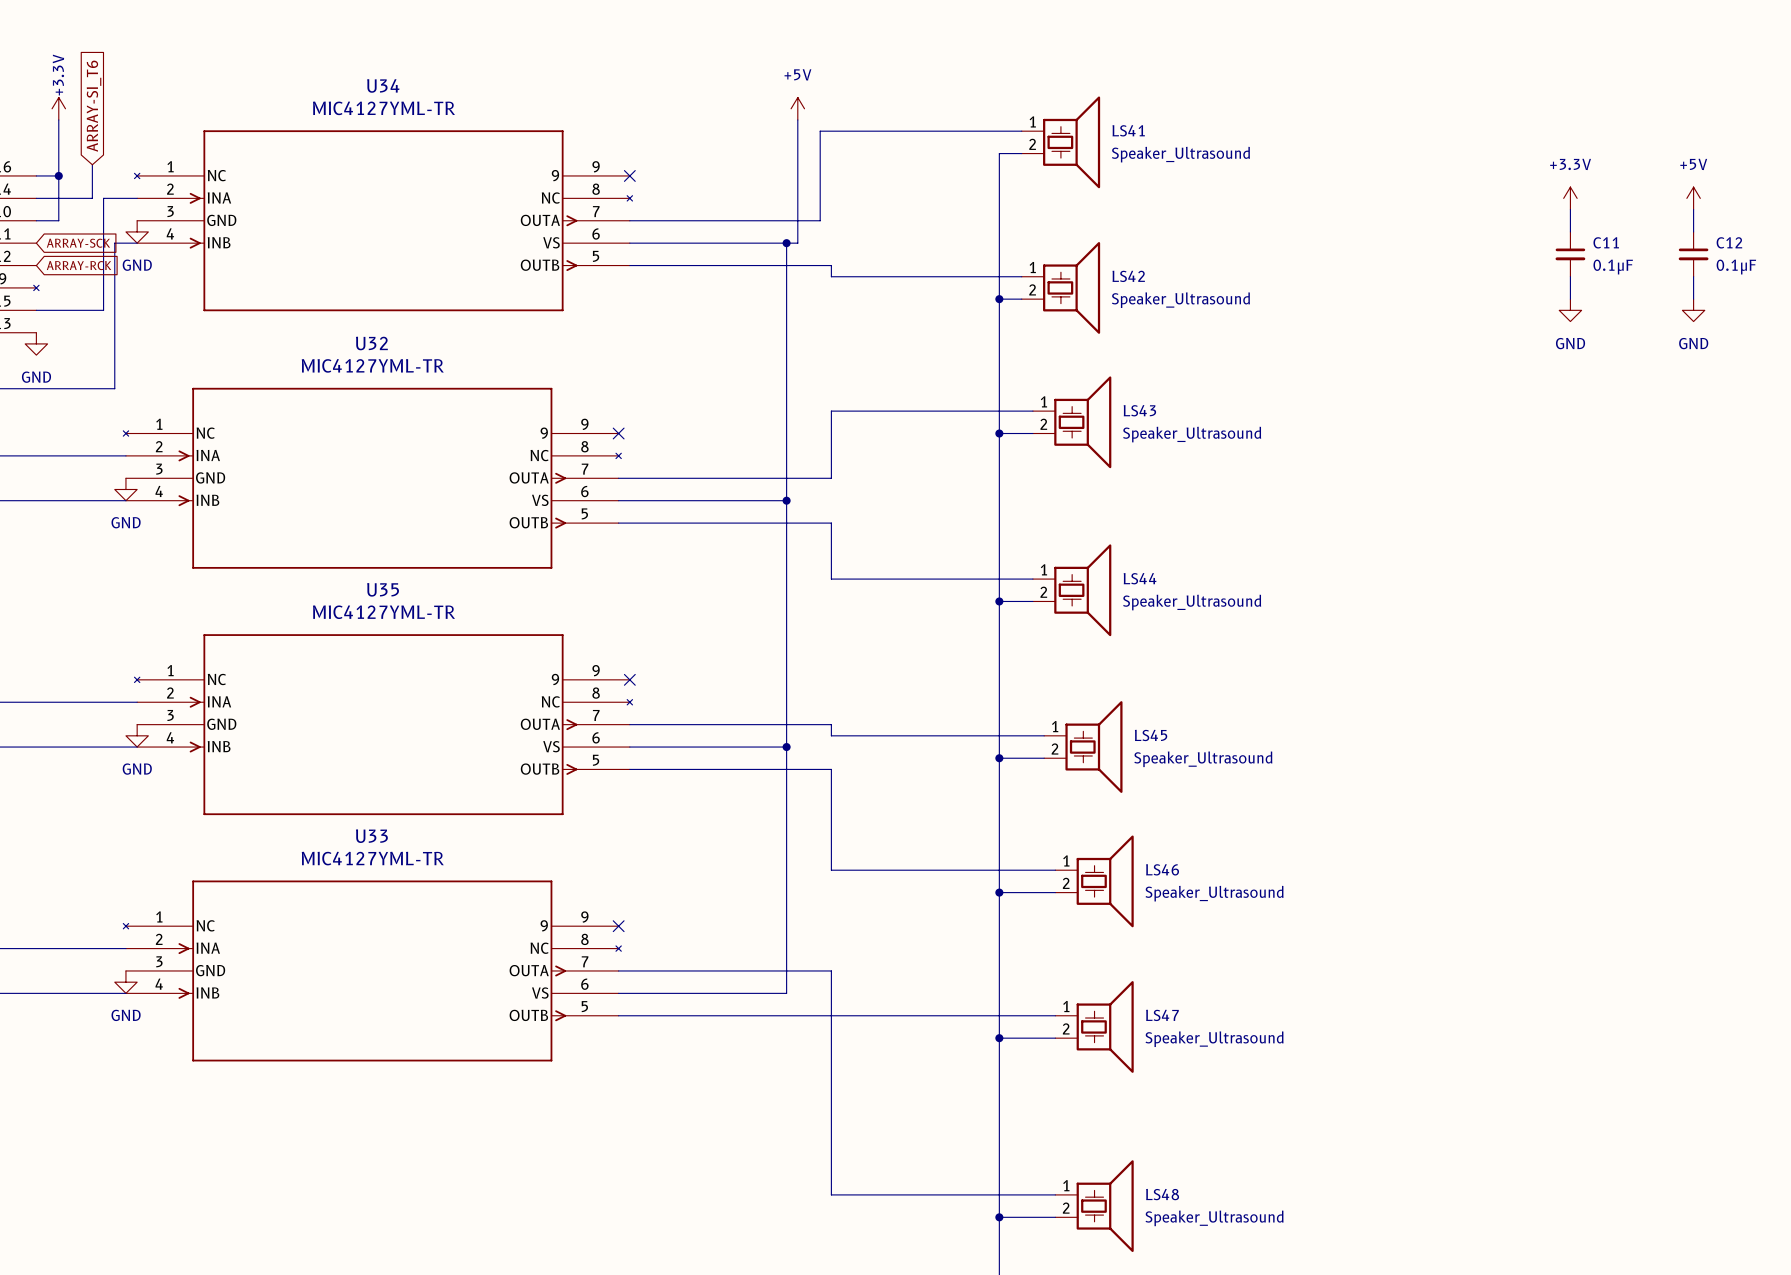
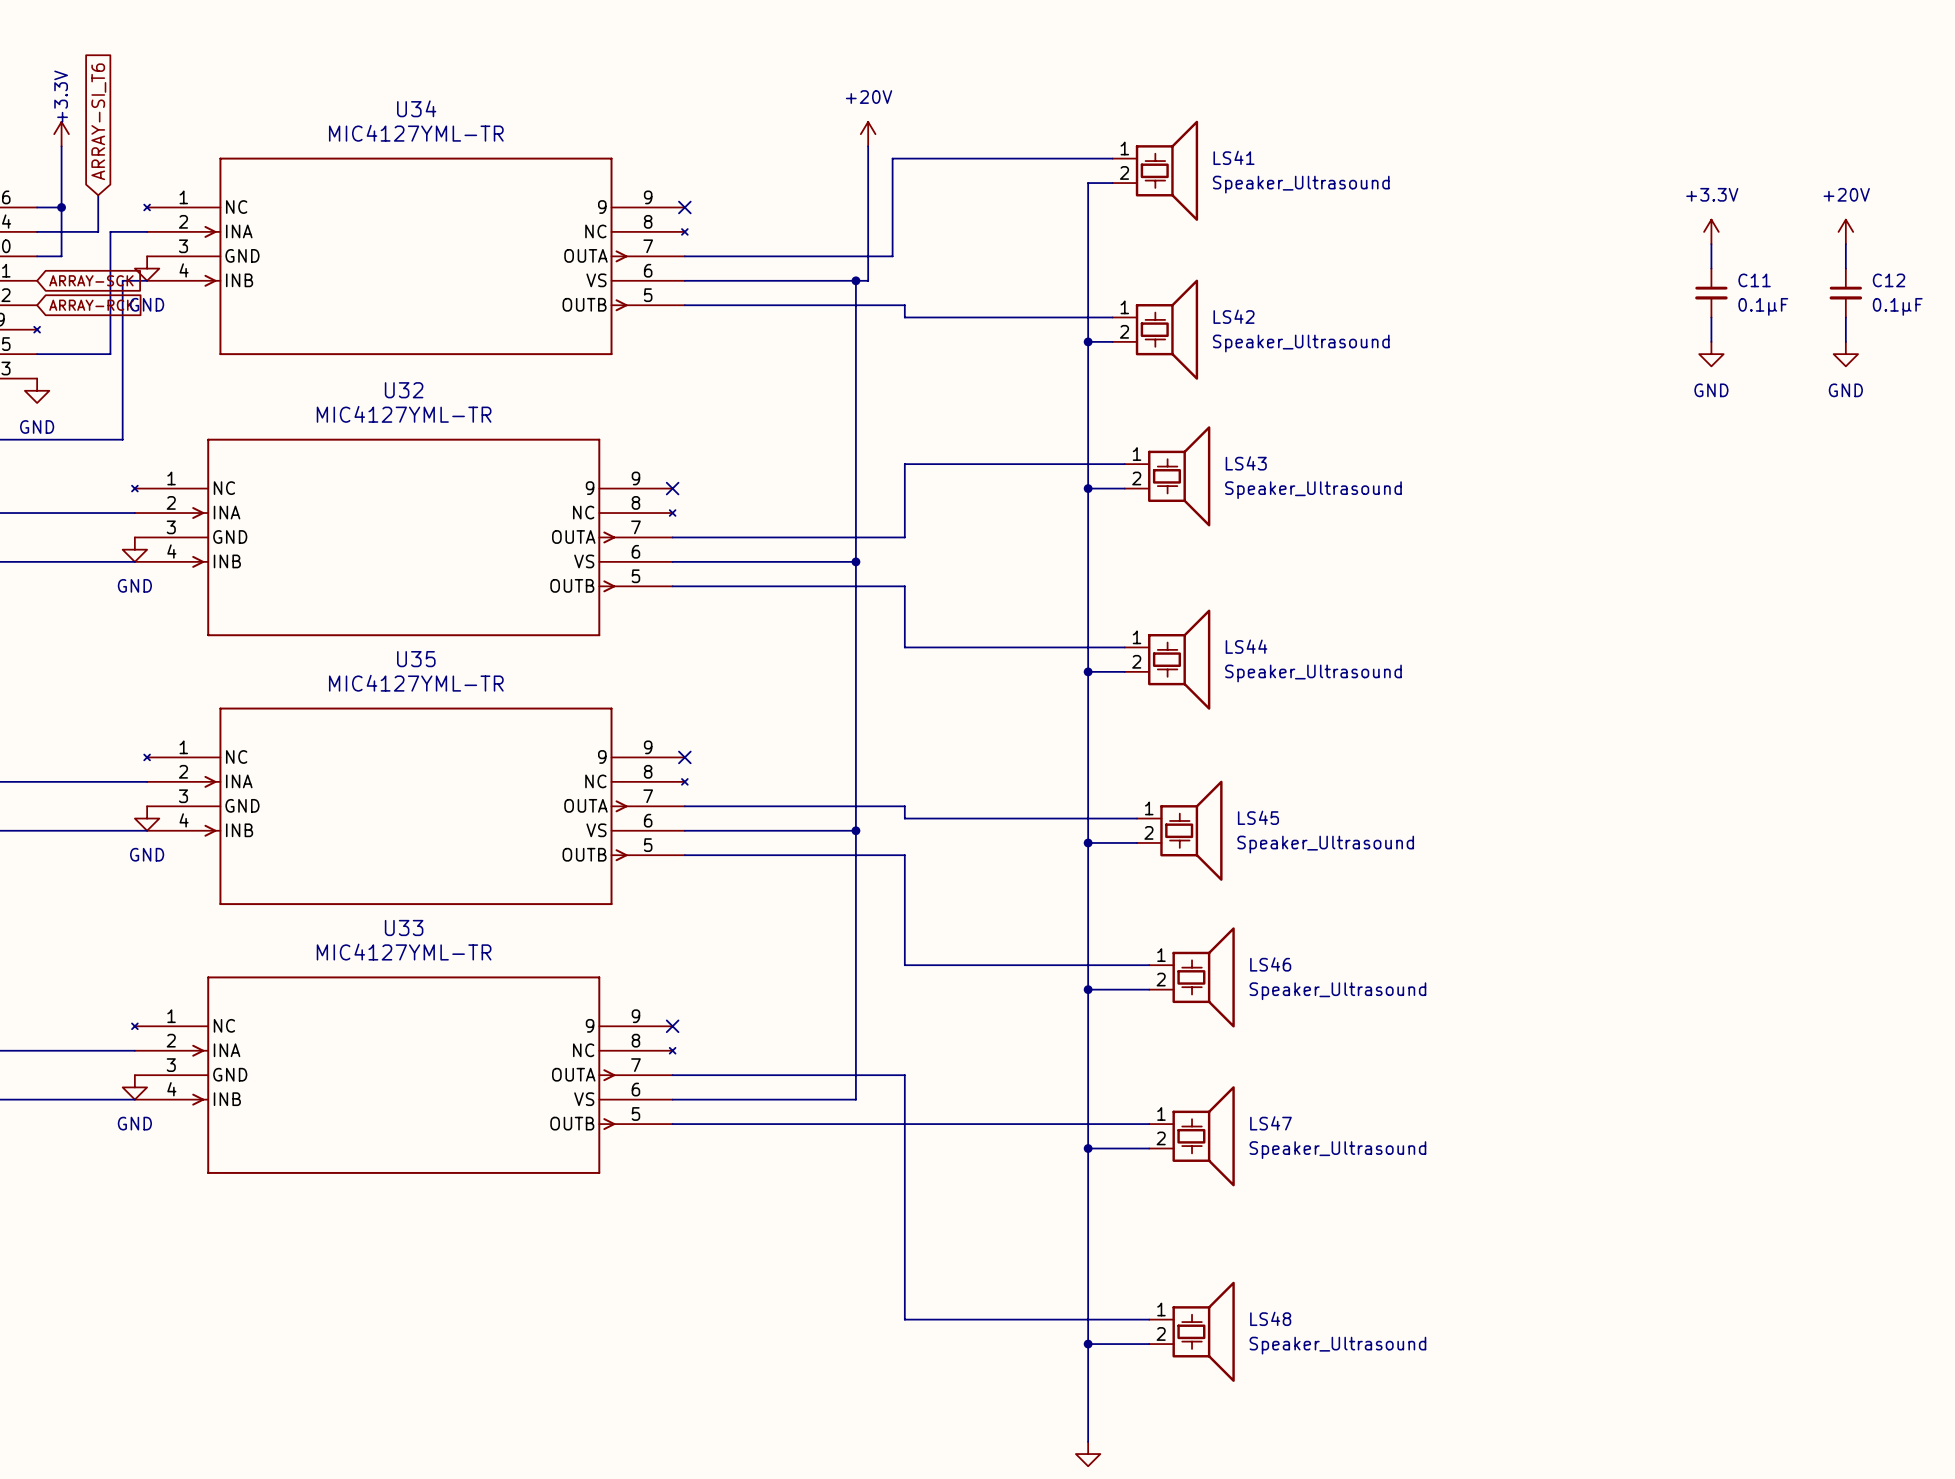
power symbol: +5V (797, 108) -> +20V (868, 134)
power symbol: +5V (1693, 198) -> +20V (1845, 231)

